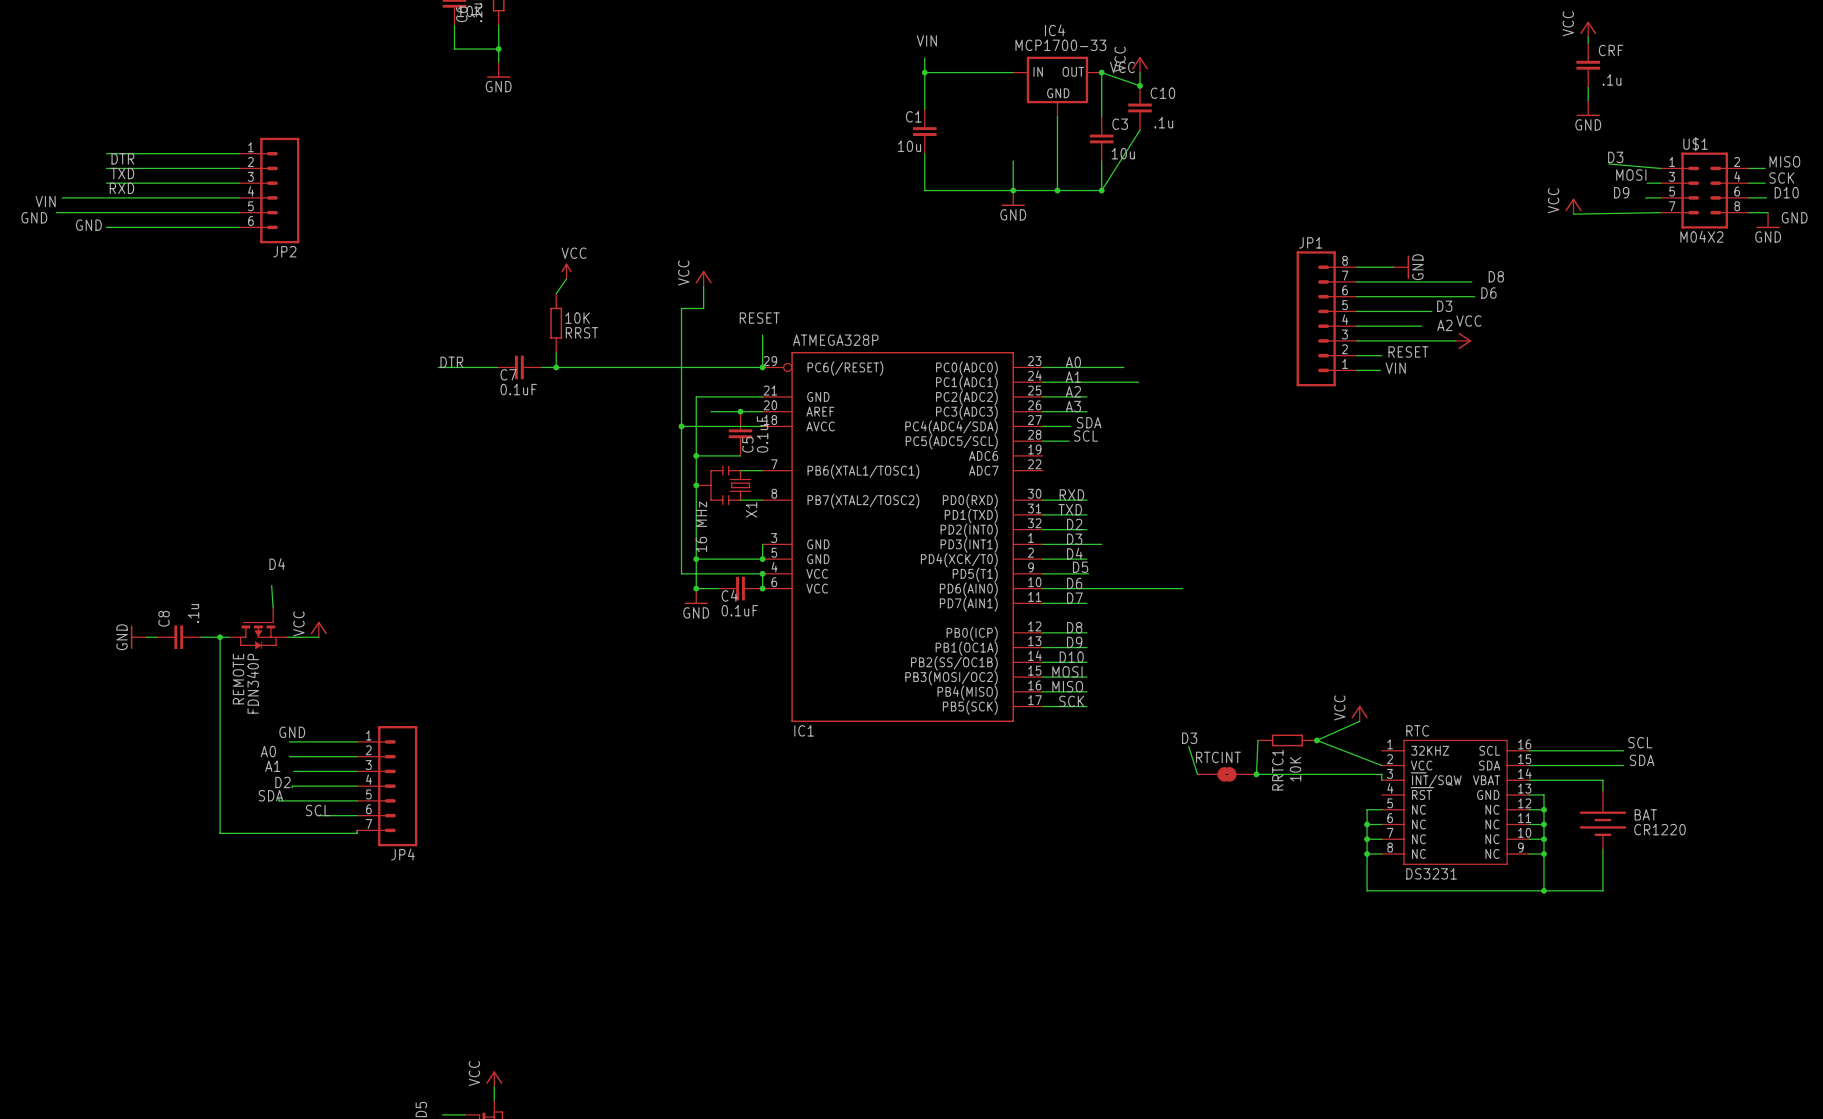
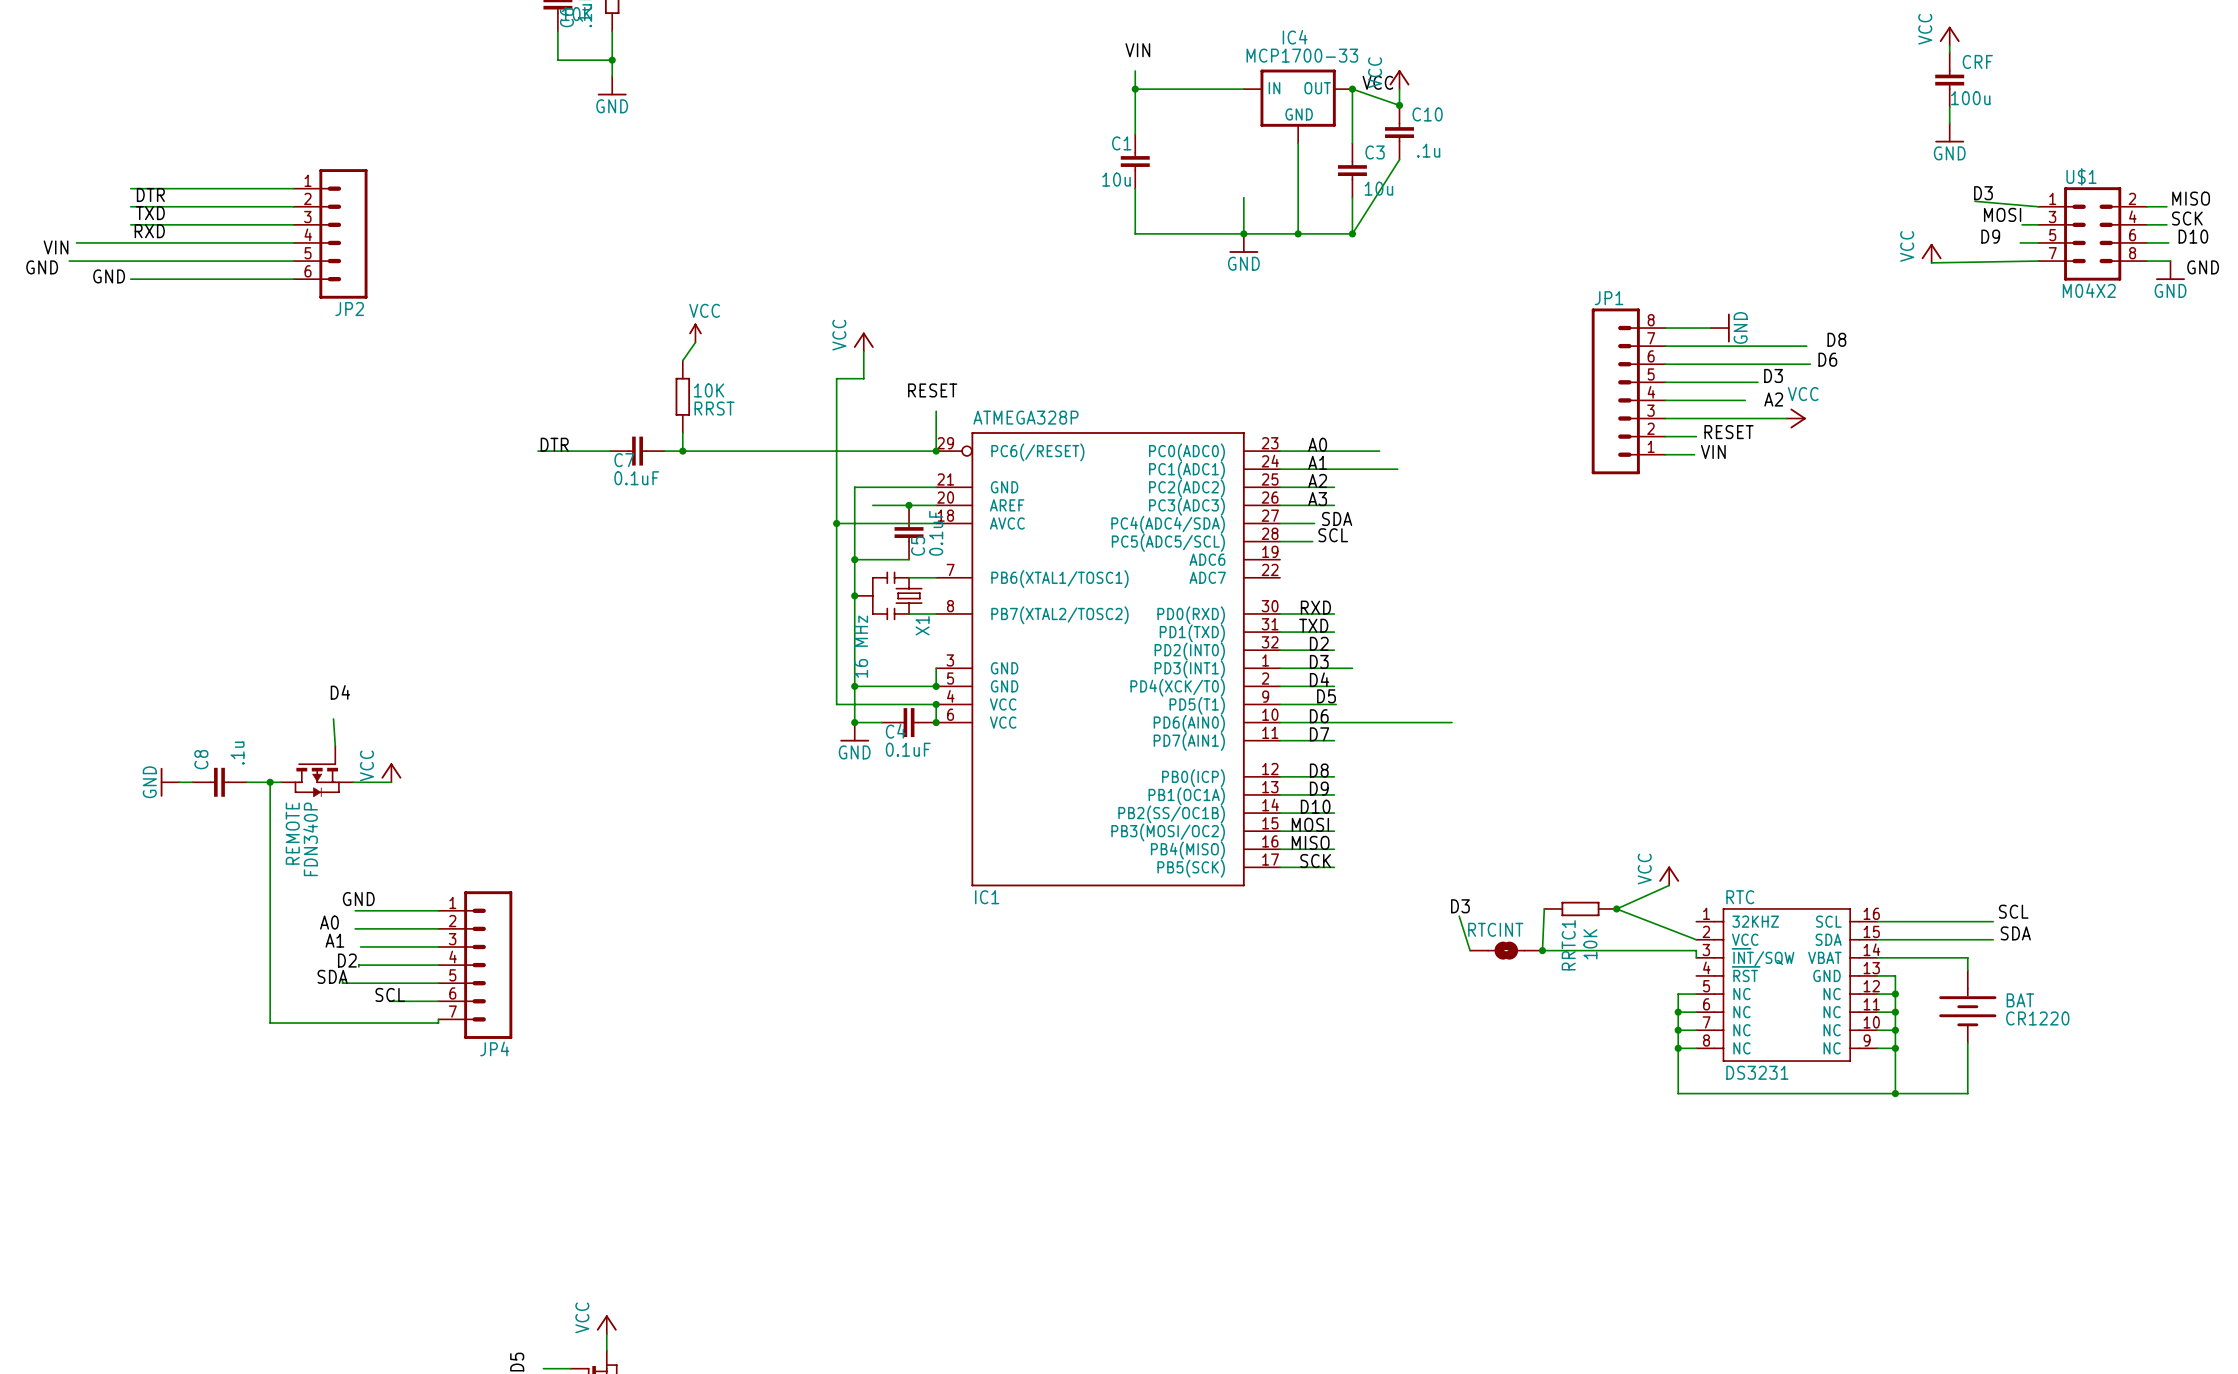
CRF value: .1u (1612, 79) -> 100u (1970, 98)

